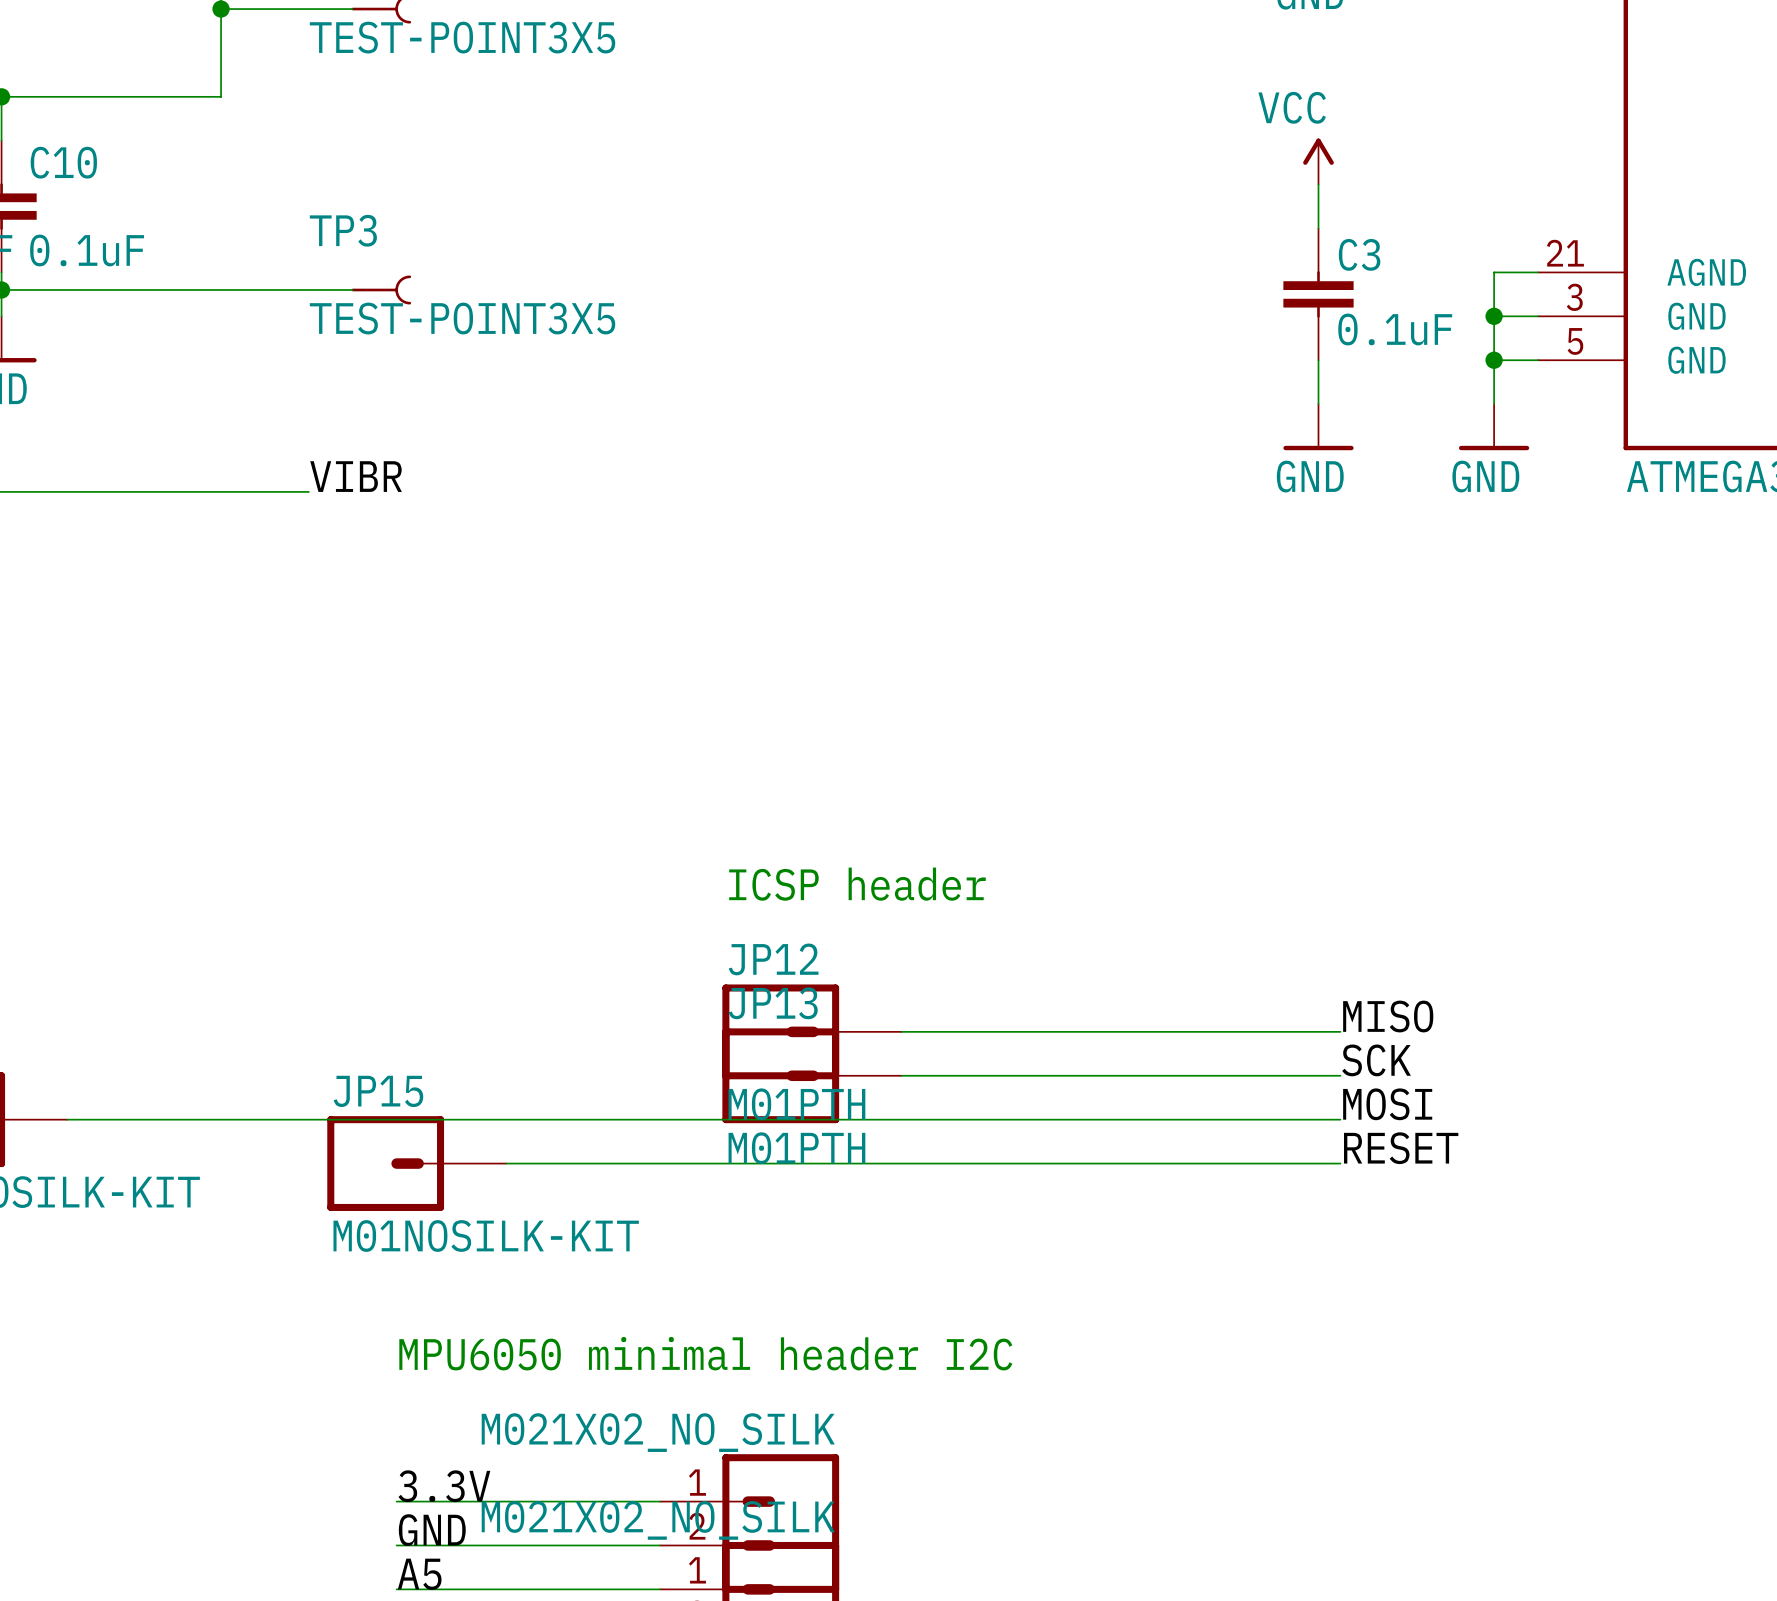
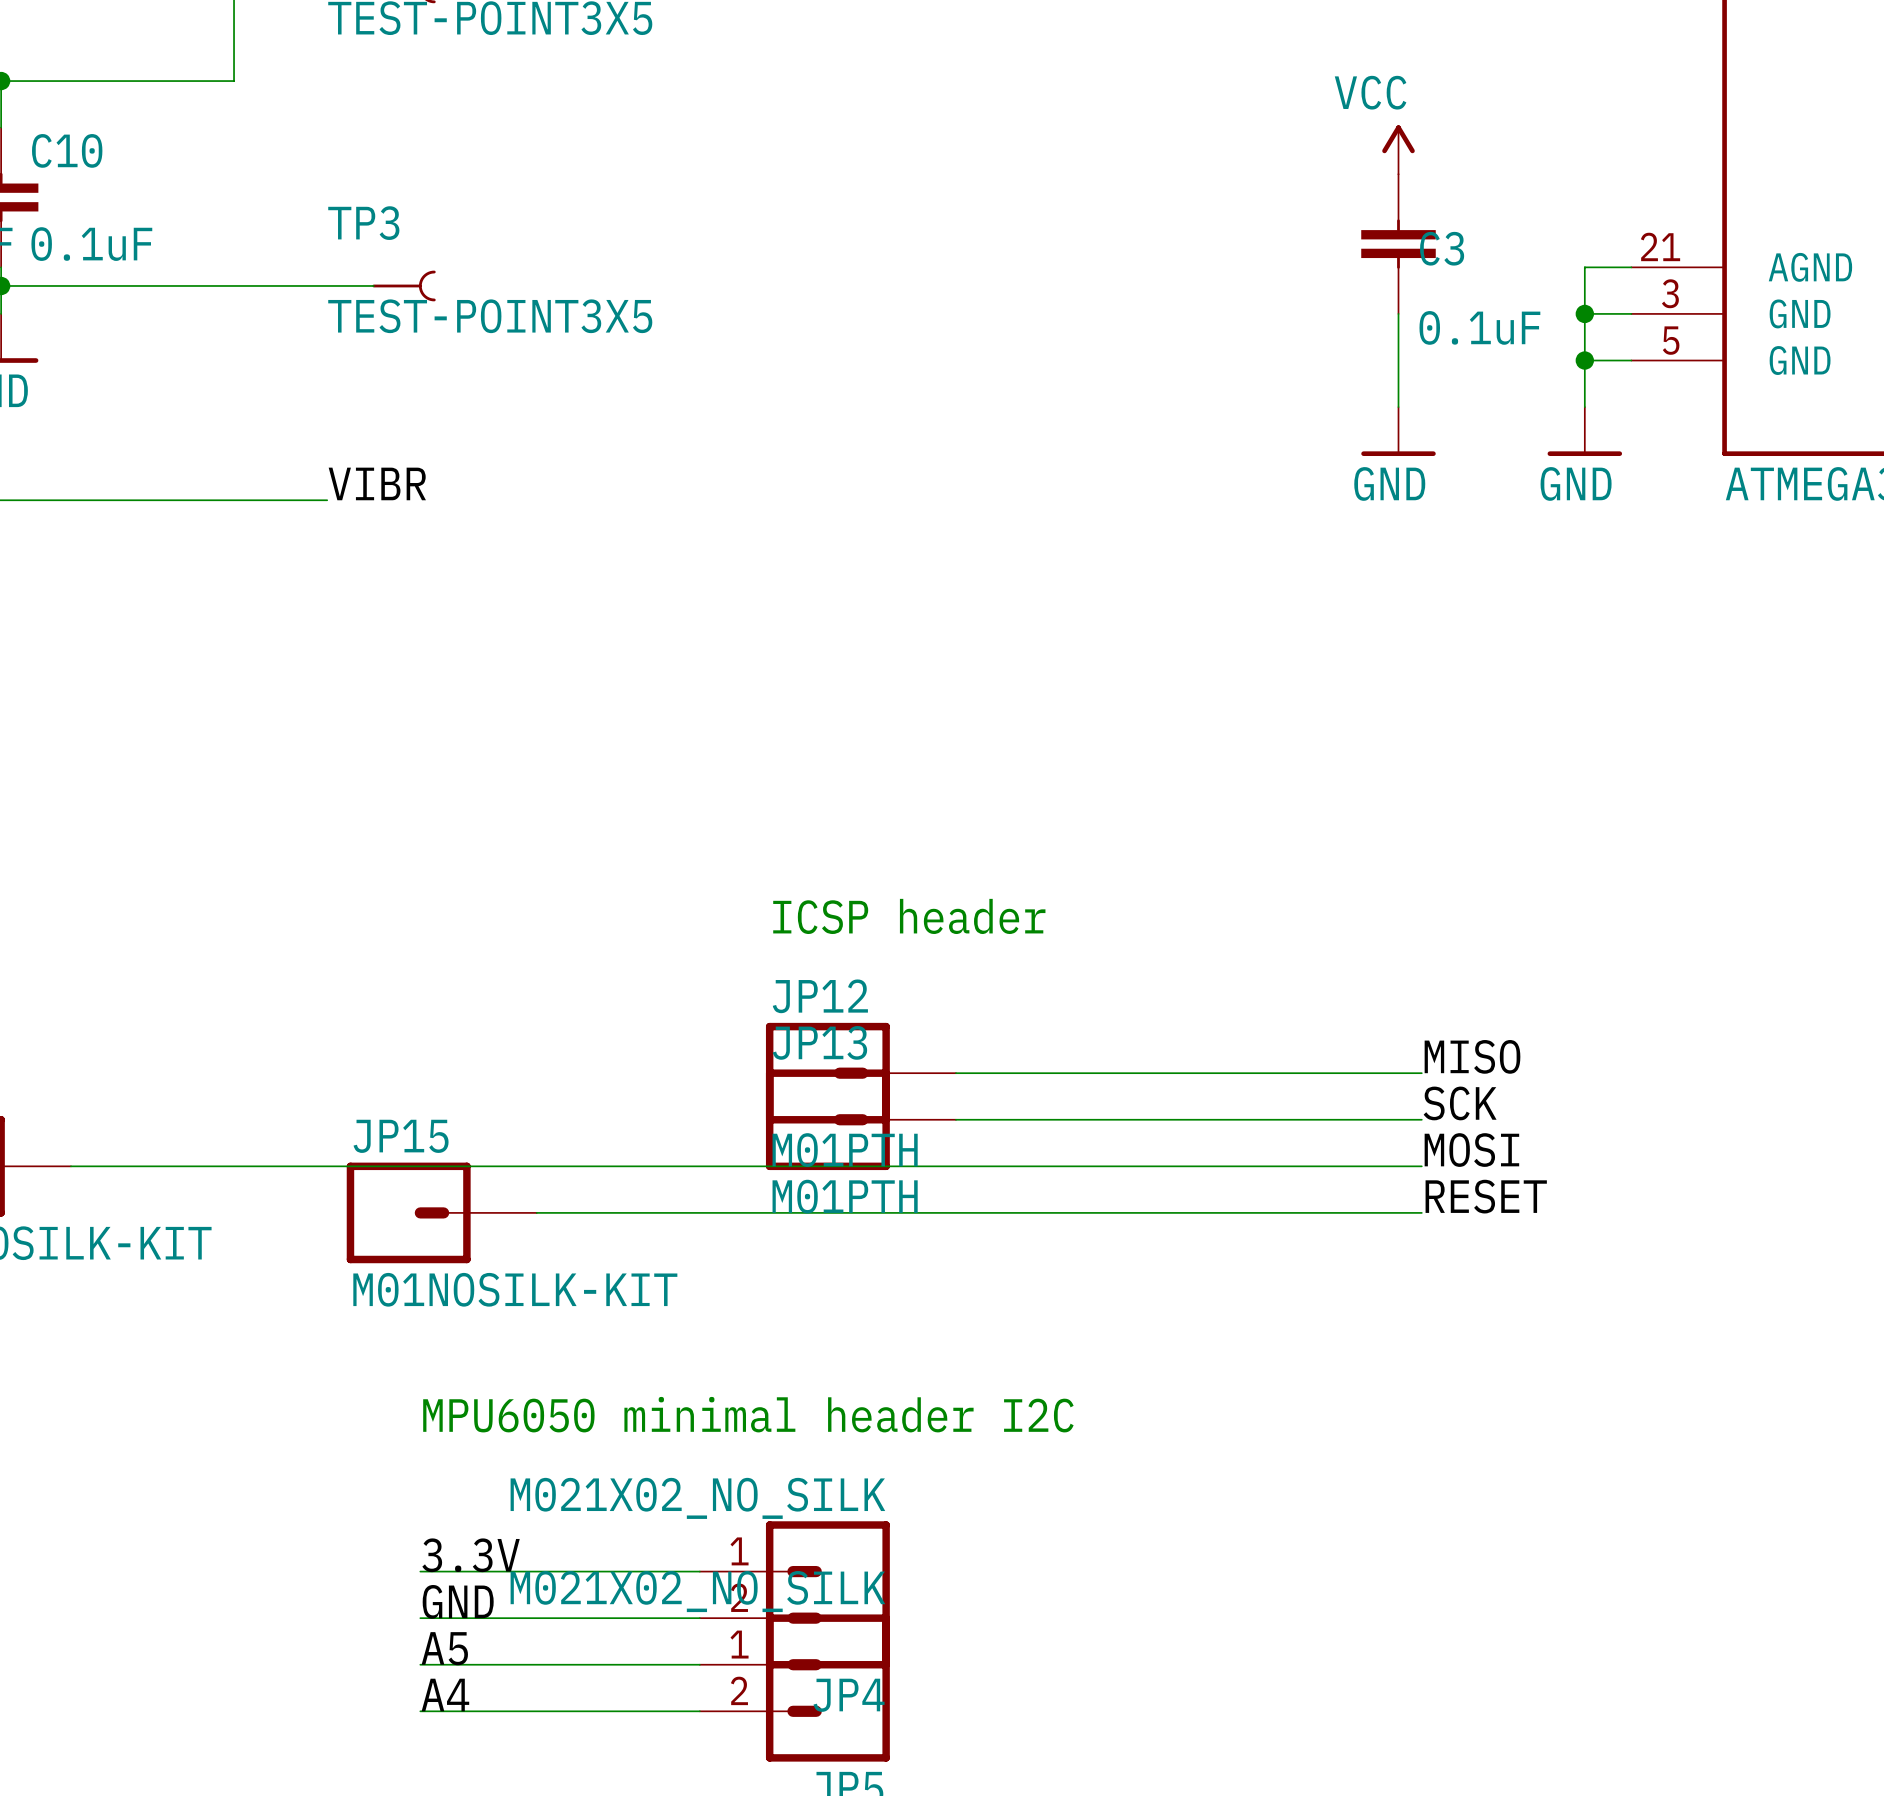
C3 position: (1318, 294) -> (1398, 244)

